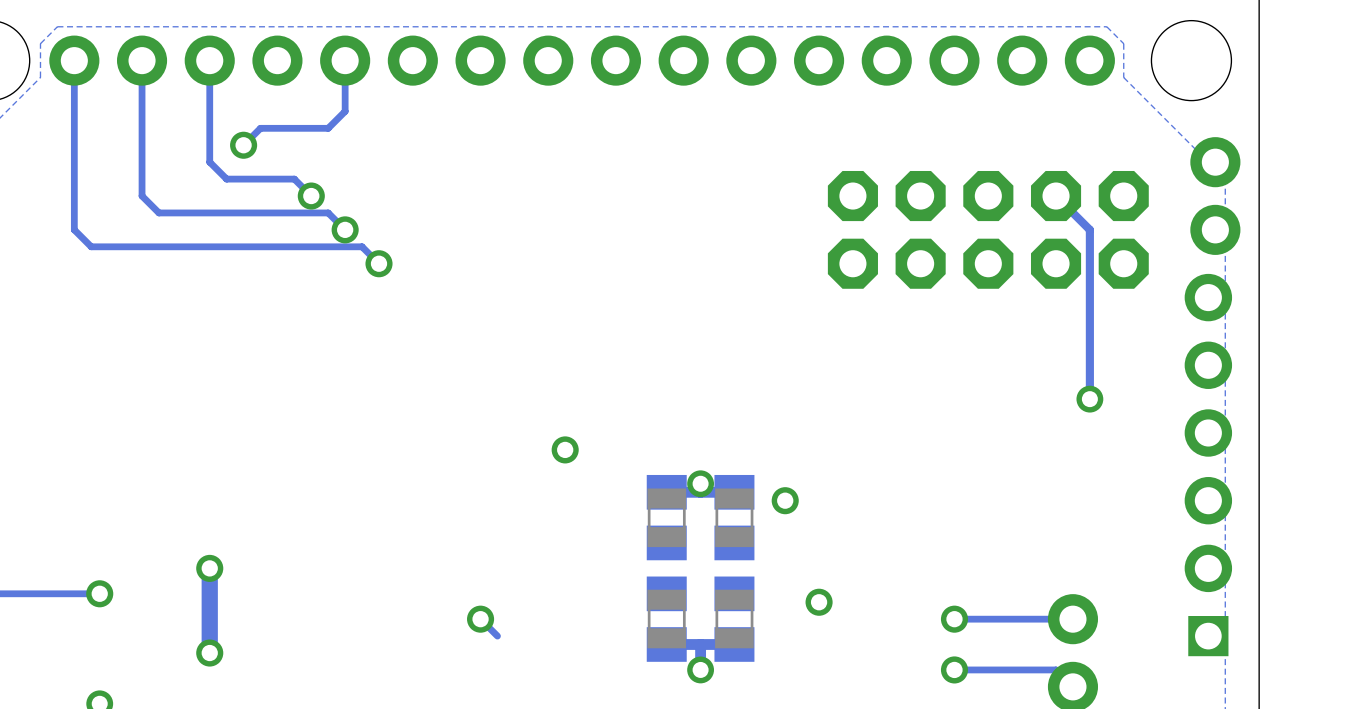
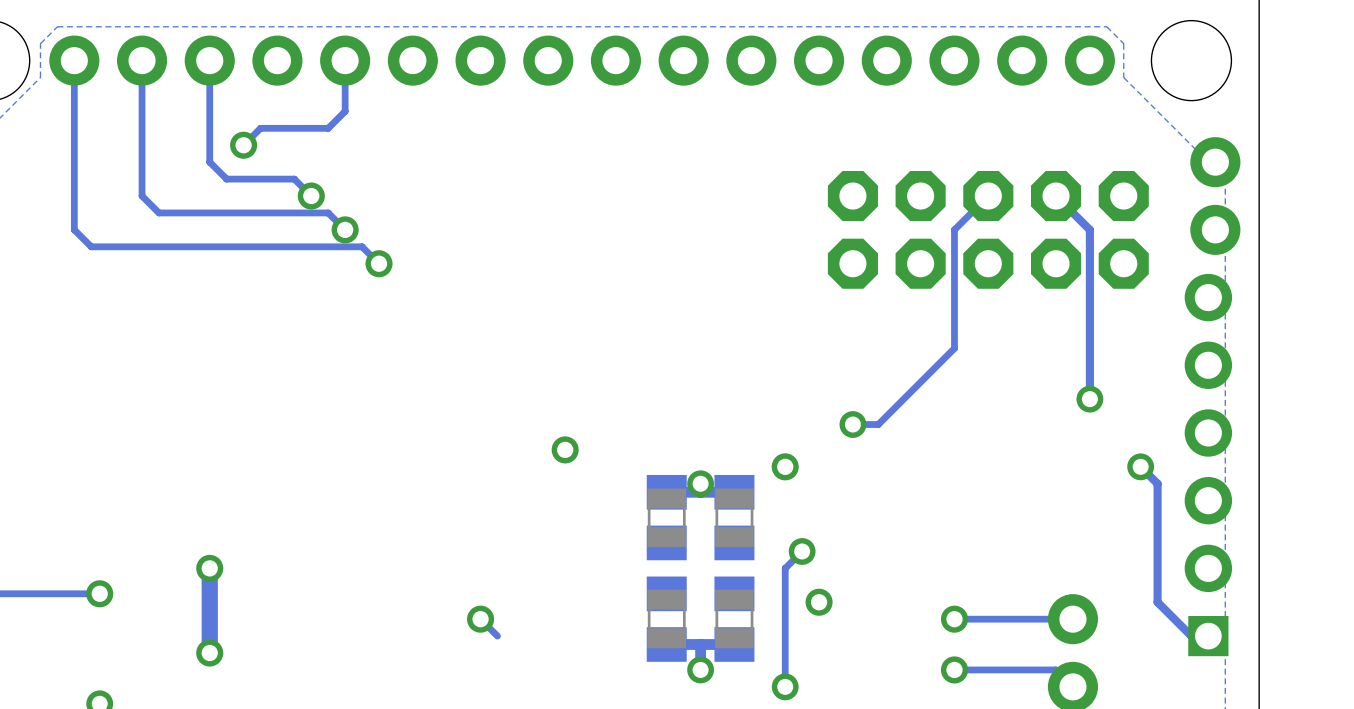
track: none -> (988, 196) (954, 229) (954, 348) (878, 424) (852, 424)
via: none -> (852, 424)
track: none -> (1140, 466) (1157, 483) (1157, 602) (1191, 636) (1208, 636)
via: none -> (1140, 466)
via position: (785, 500) -> (785, 466)
track: none -> (802, 551) (785, 568) (785, 686)
via: none -> (802, 551)
via: none -> (785, 686)

